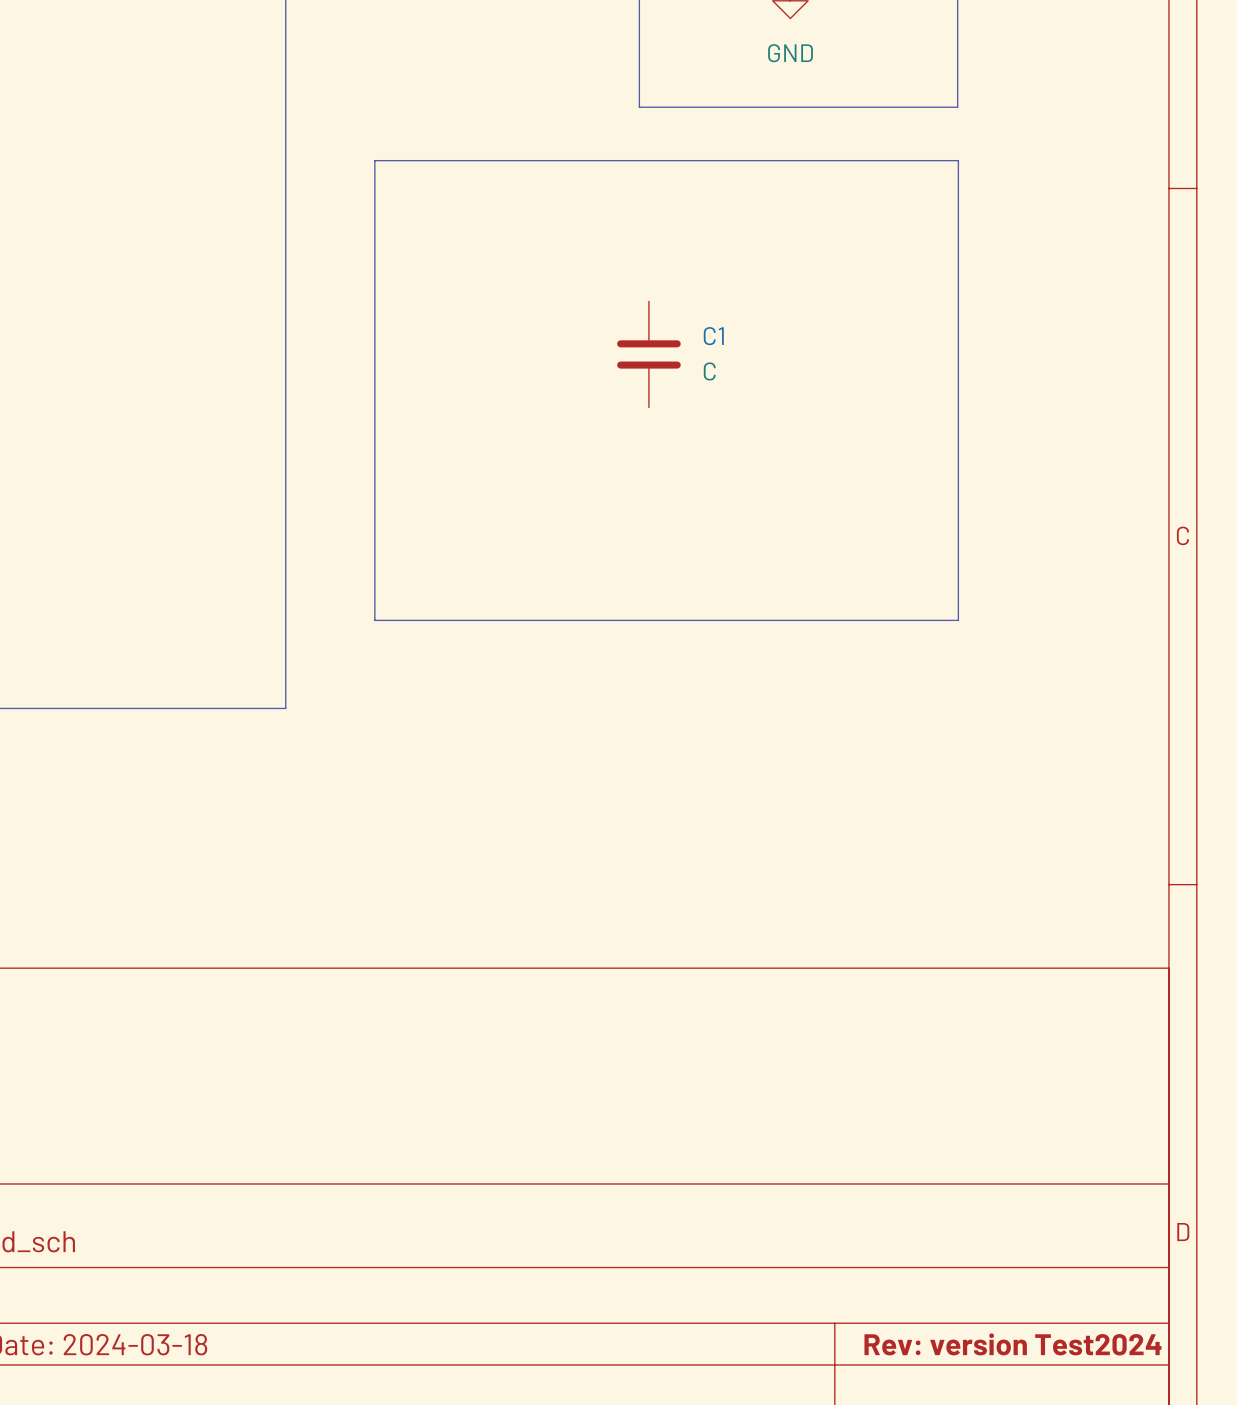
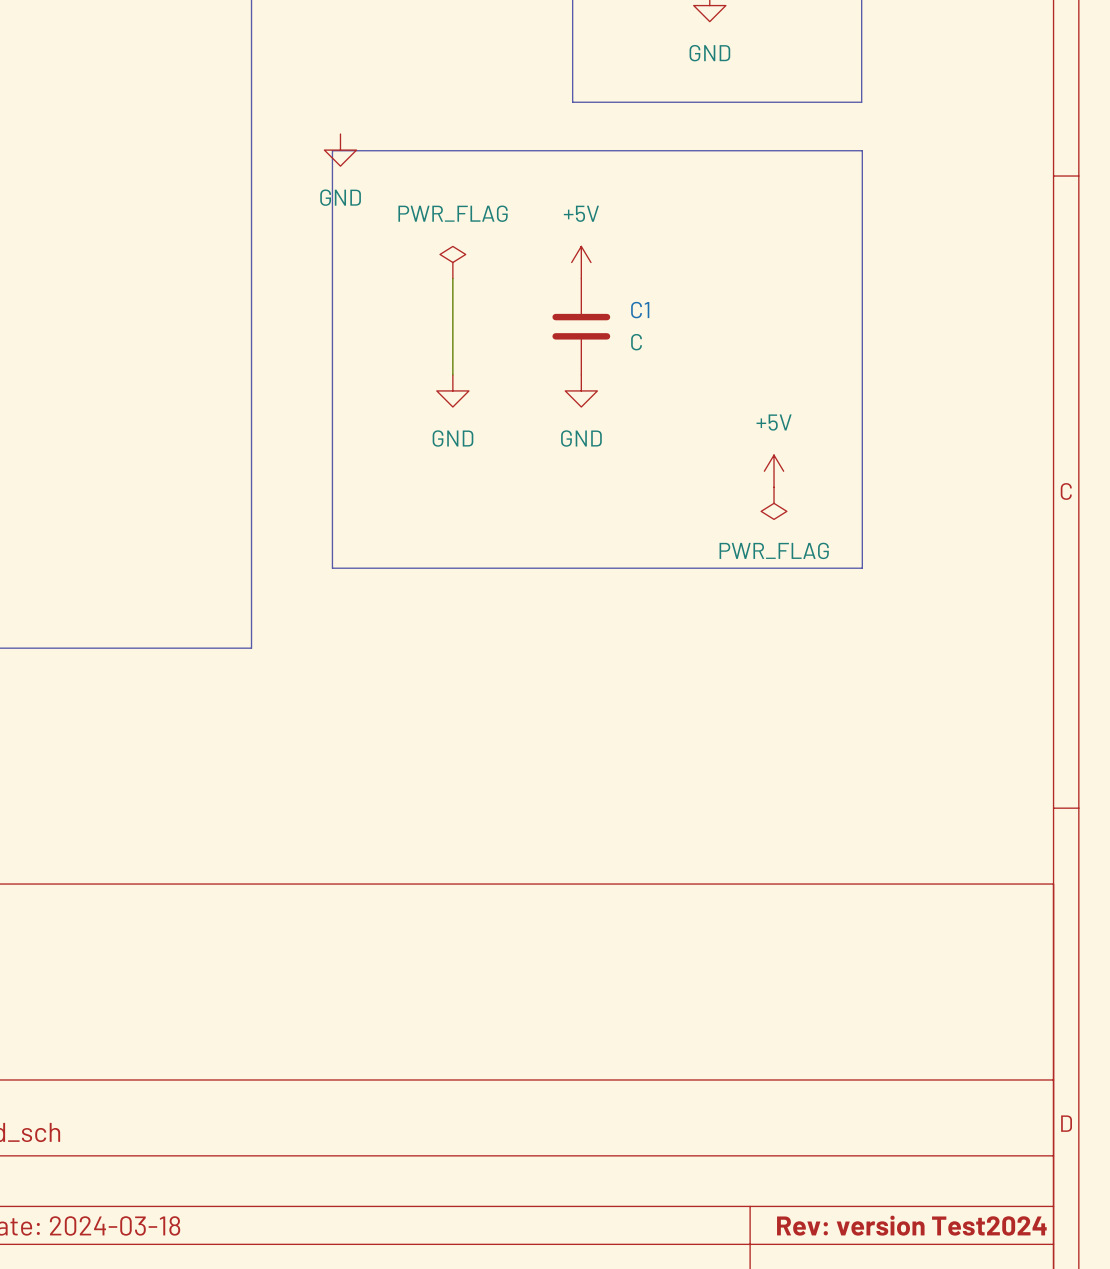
power symbol: none -> GND (340, 150)
power symbol: none -> PWR_FLAG (452, 262)
power symbol: none -> +5V (581, 262)
wire: none -> (452, 278) (452, 374)
power symbol: none -> GND (452, 390)
power symbol: none -> GND (581, 390)
power symbol: none -> +5V (774, 471)
power symbol: none -> PWR_FLAG (774, 503)

